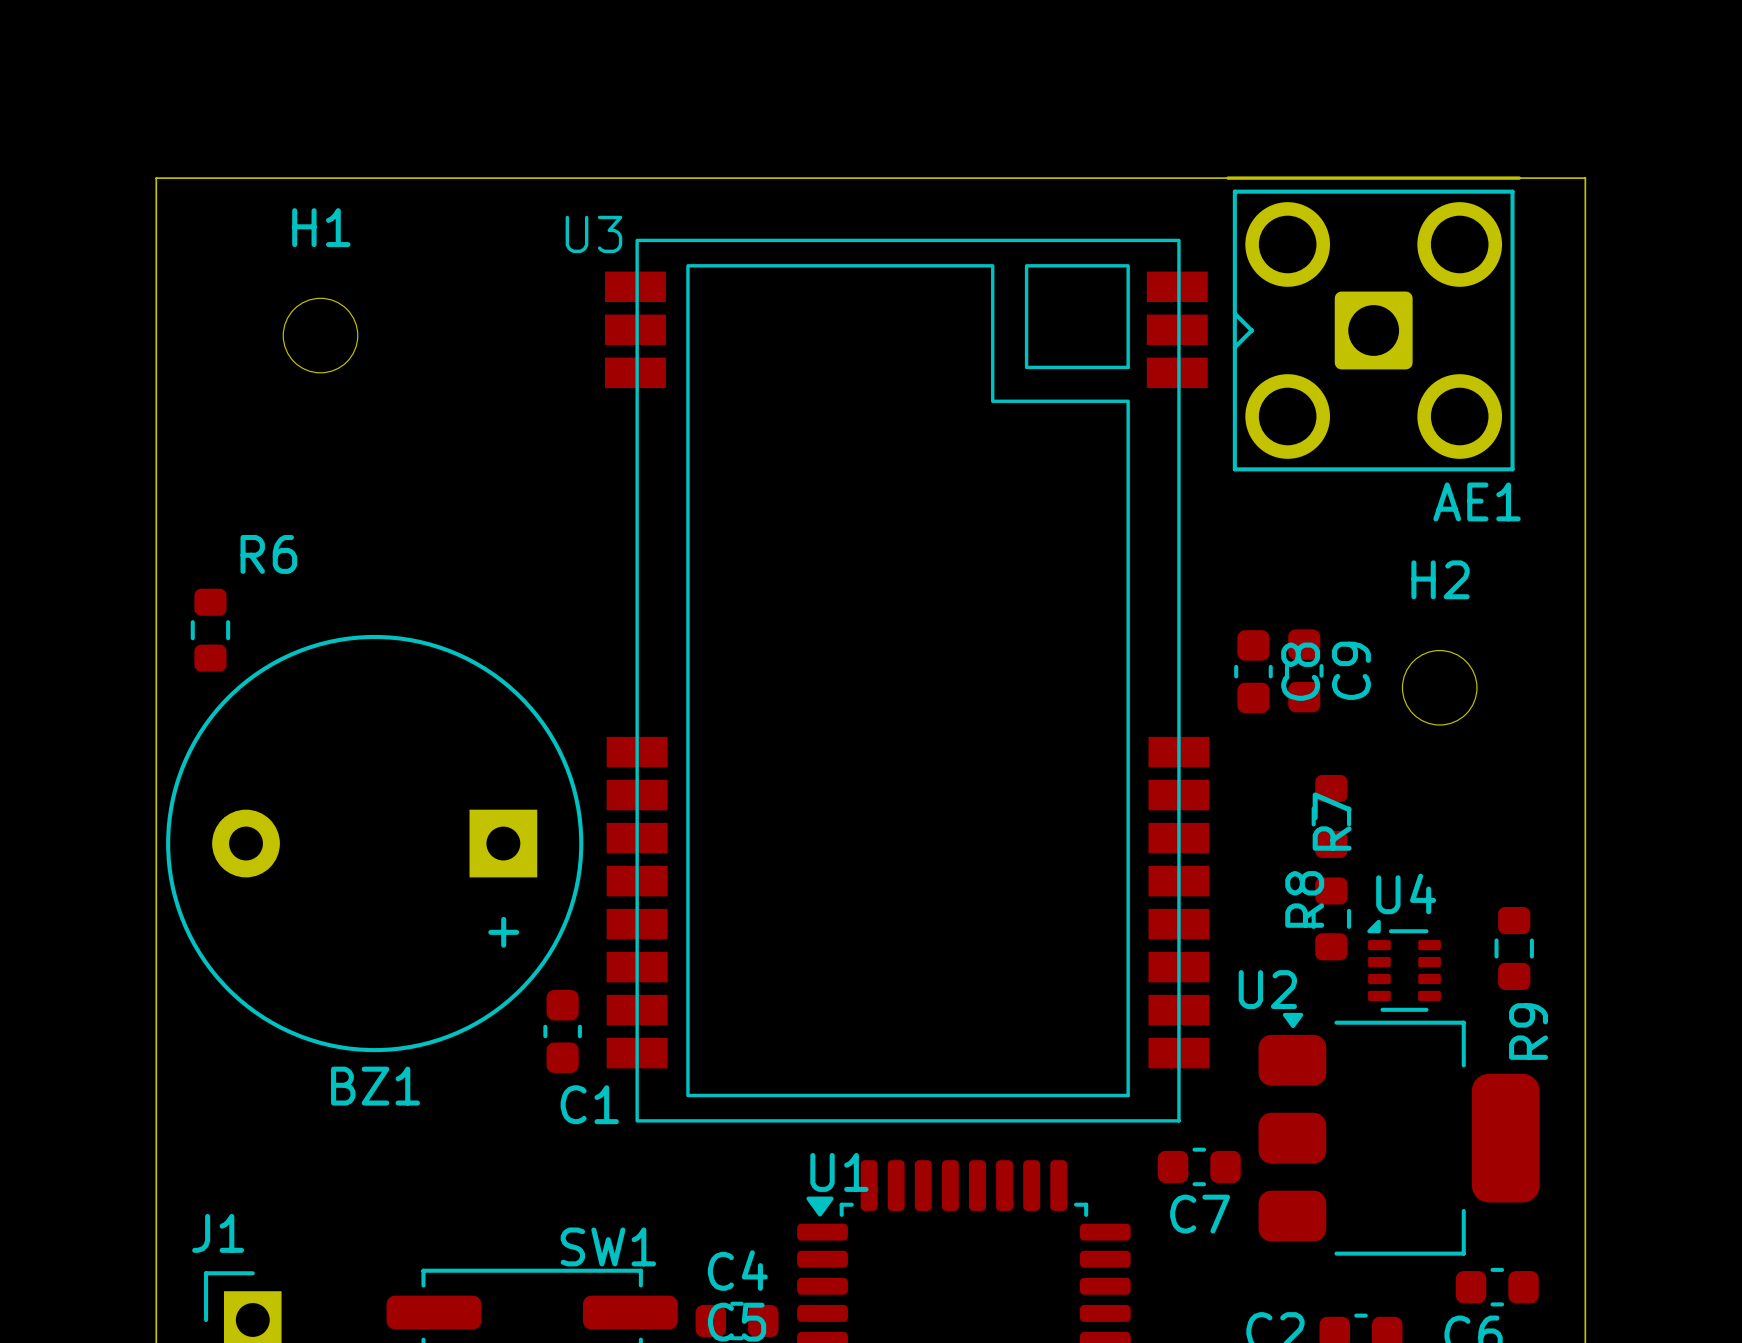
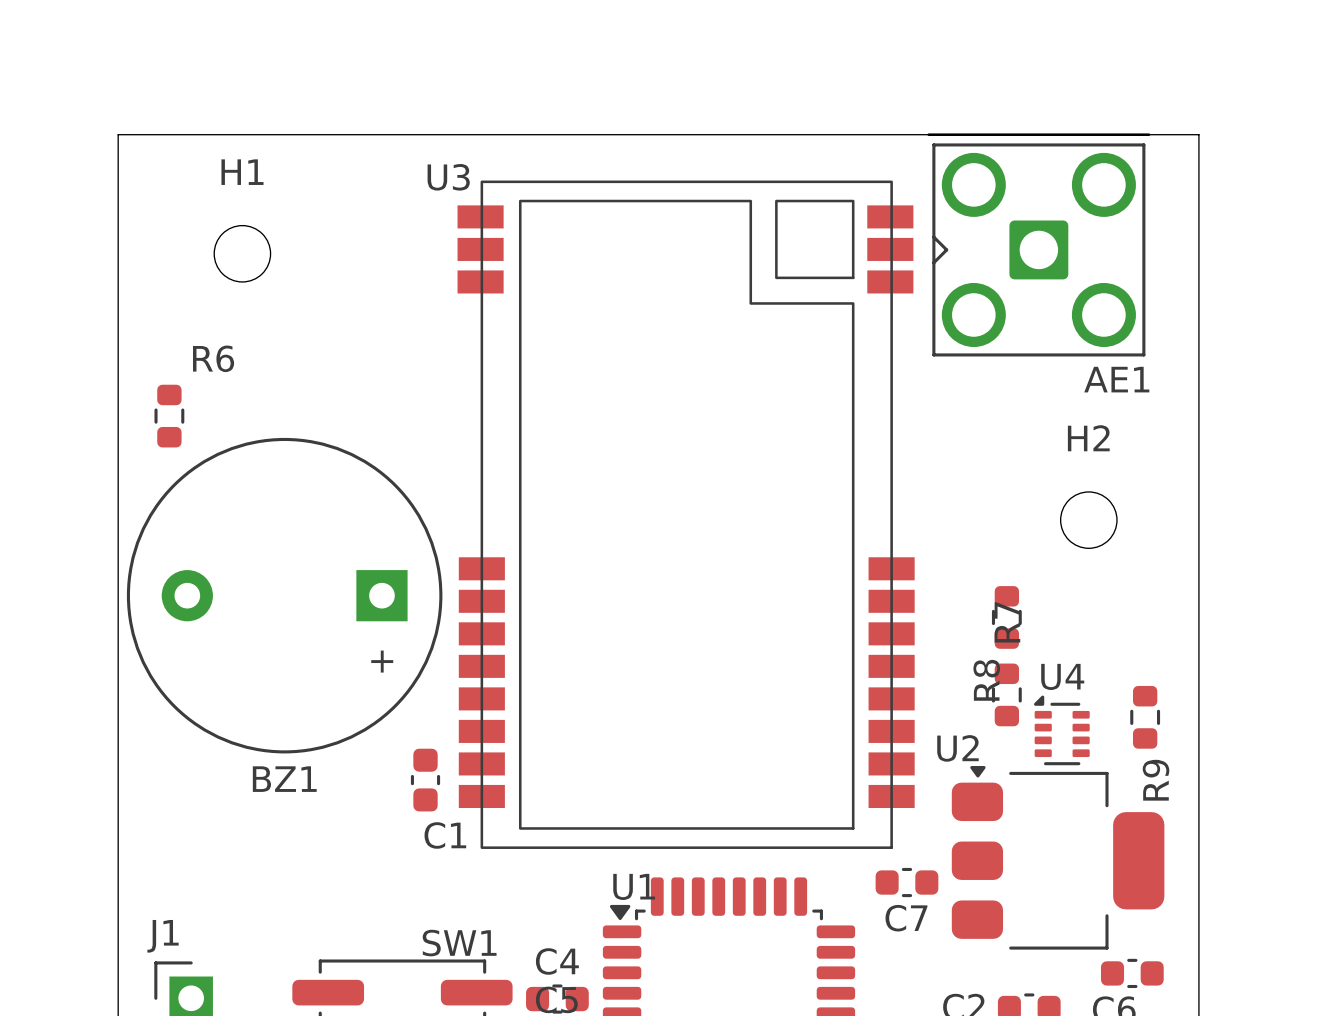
R6 position: (210, 630) -> (169, 416)
C9: (1304, 670) -> none
C8: (1253, 671) -> none
BZ1 position: (374, 843) -> (284, 595)

